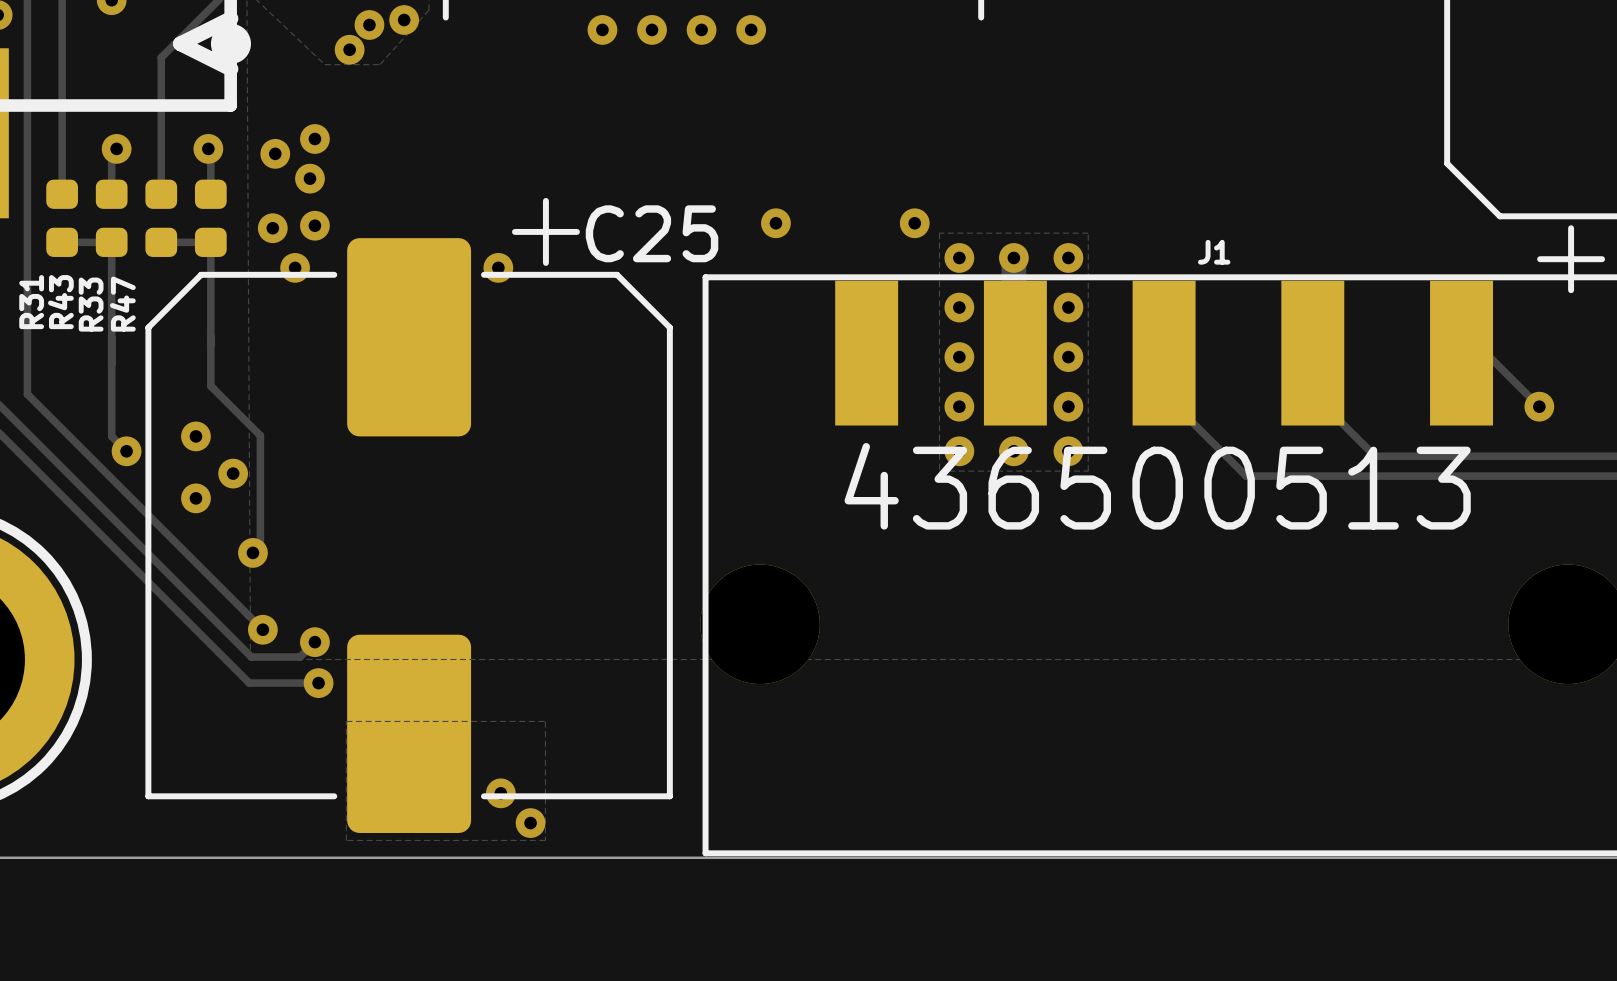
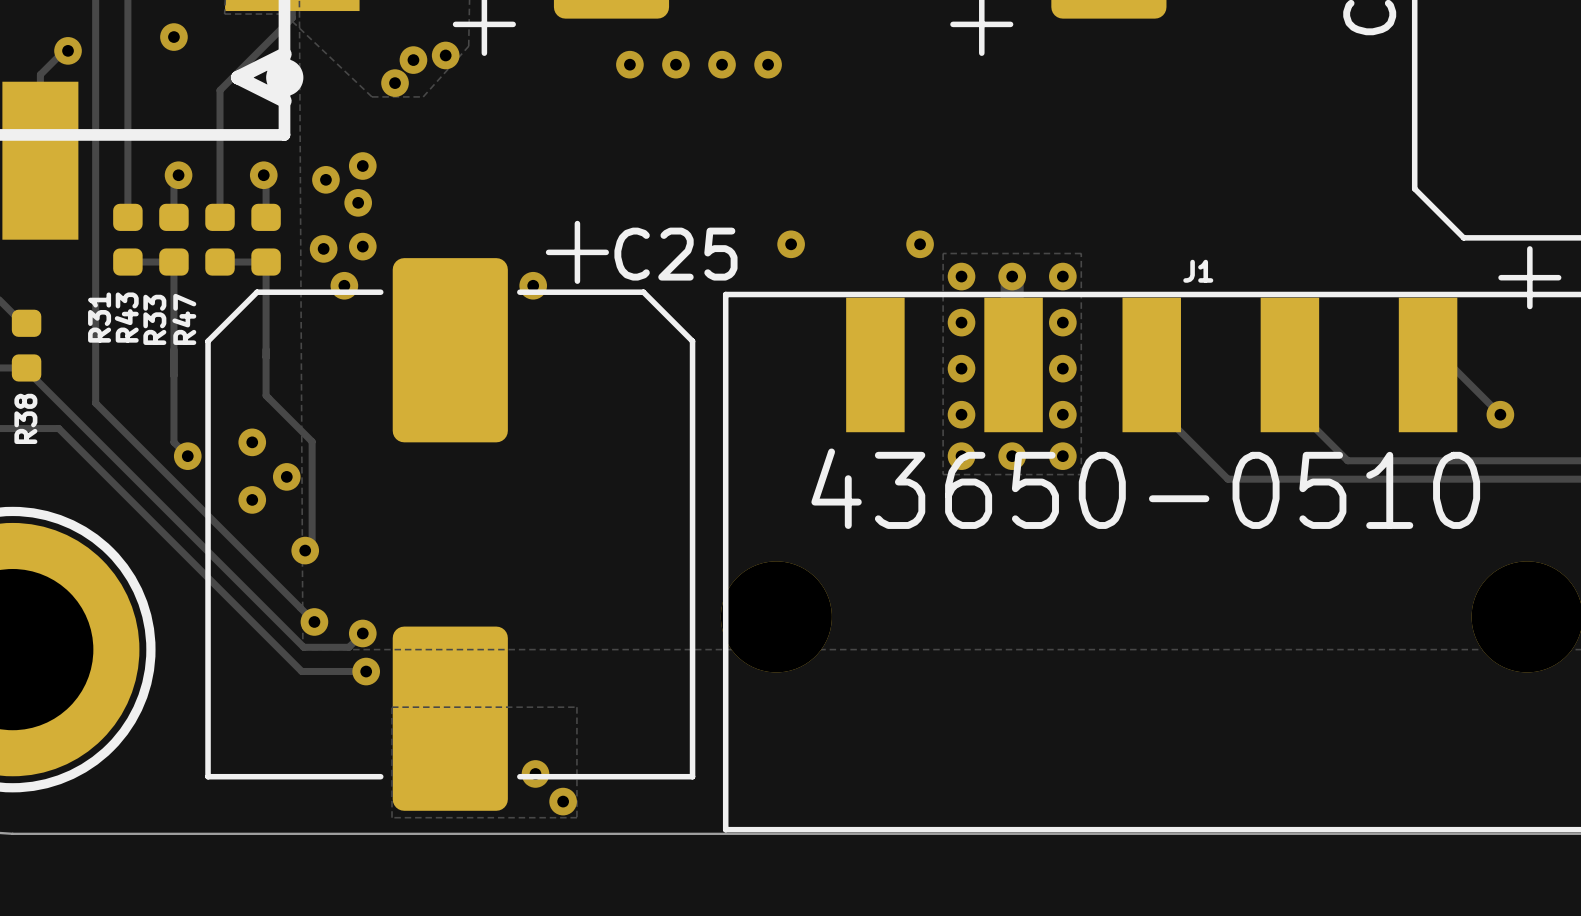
J1 value: 436500513 (1157, 486) -> 43650-0510 (1145, 488)

